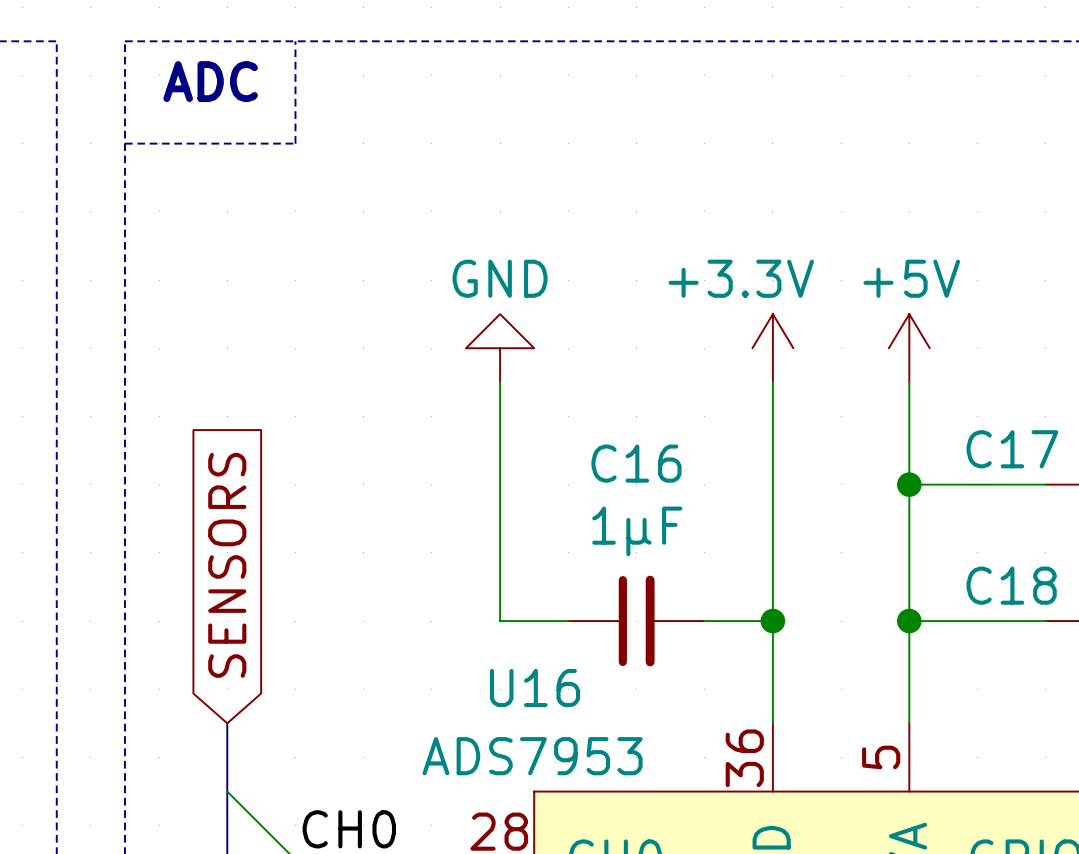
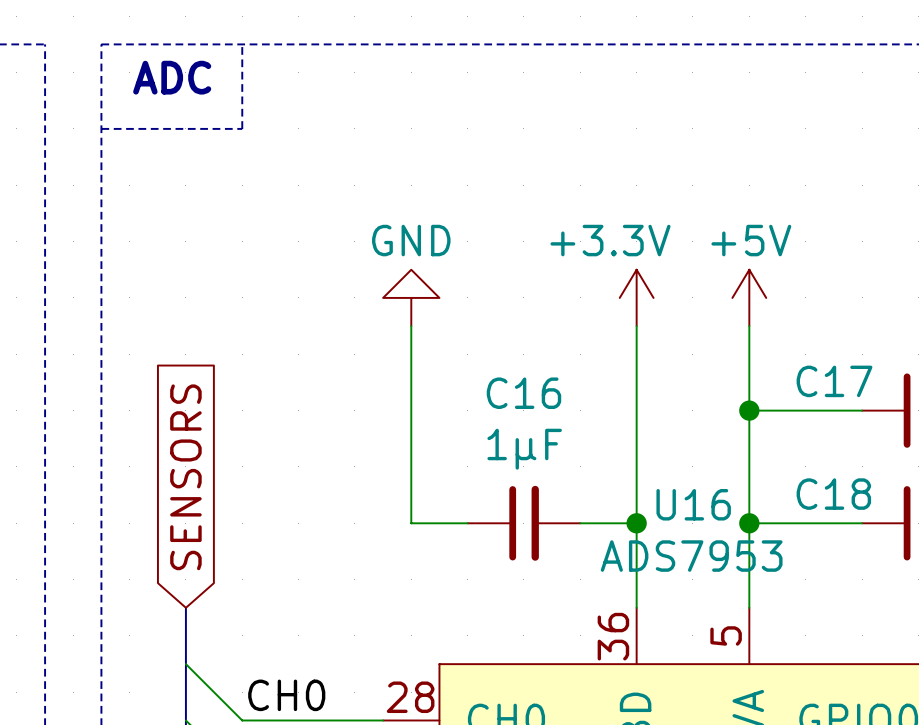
U16 name position: U16 (535, 687) -> U16 (693, 504)
U16 value position: ADS7953 (532, 756) -> ADS7953 (691, 556)

